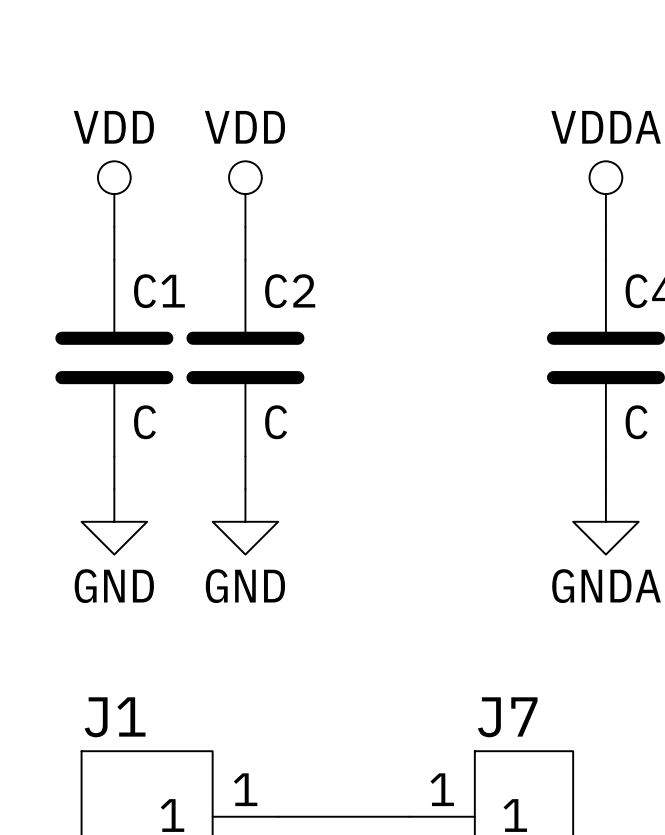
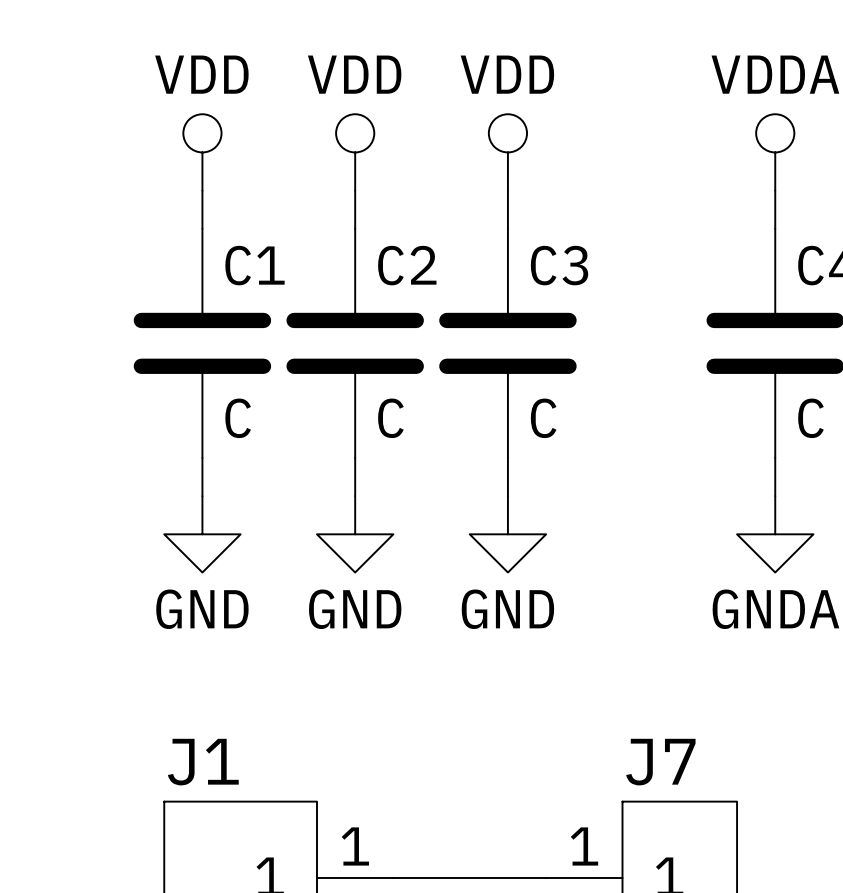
power symbol: none -> VDD (507, 152)
wire: none -> (507, 190) (507, 228)
C3: none -> C (507, 343)
wire: none -> (507, 457) (507, 496)
power symbol: none -> GND (507, 534)

